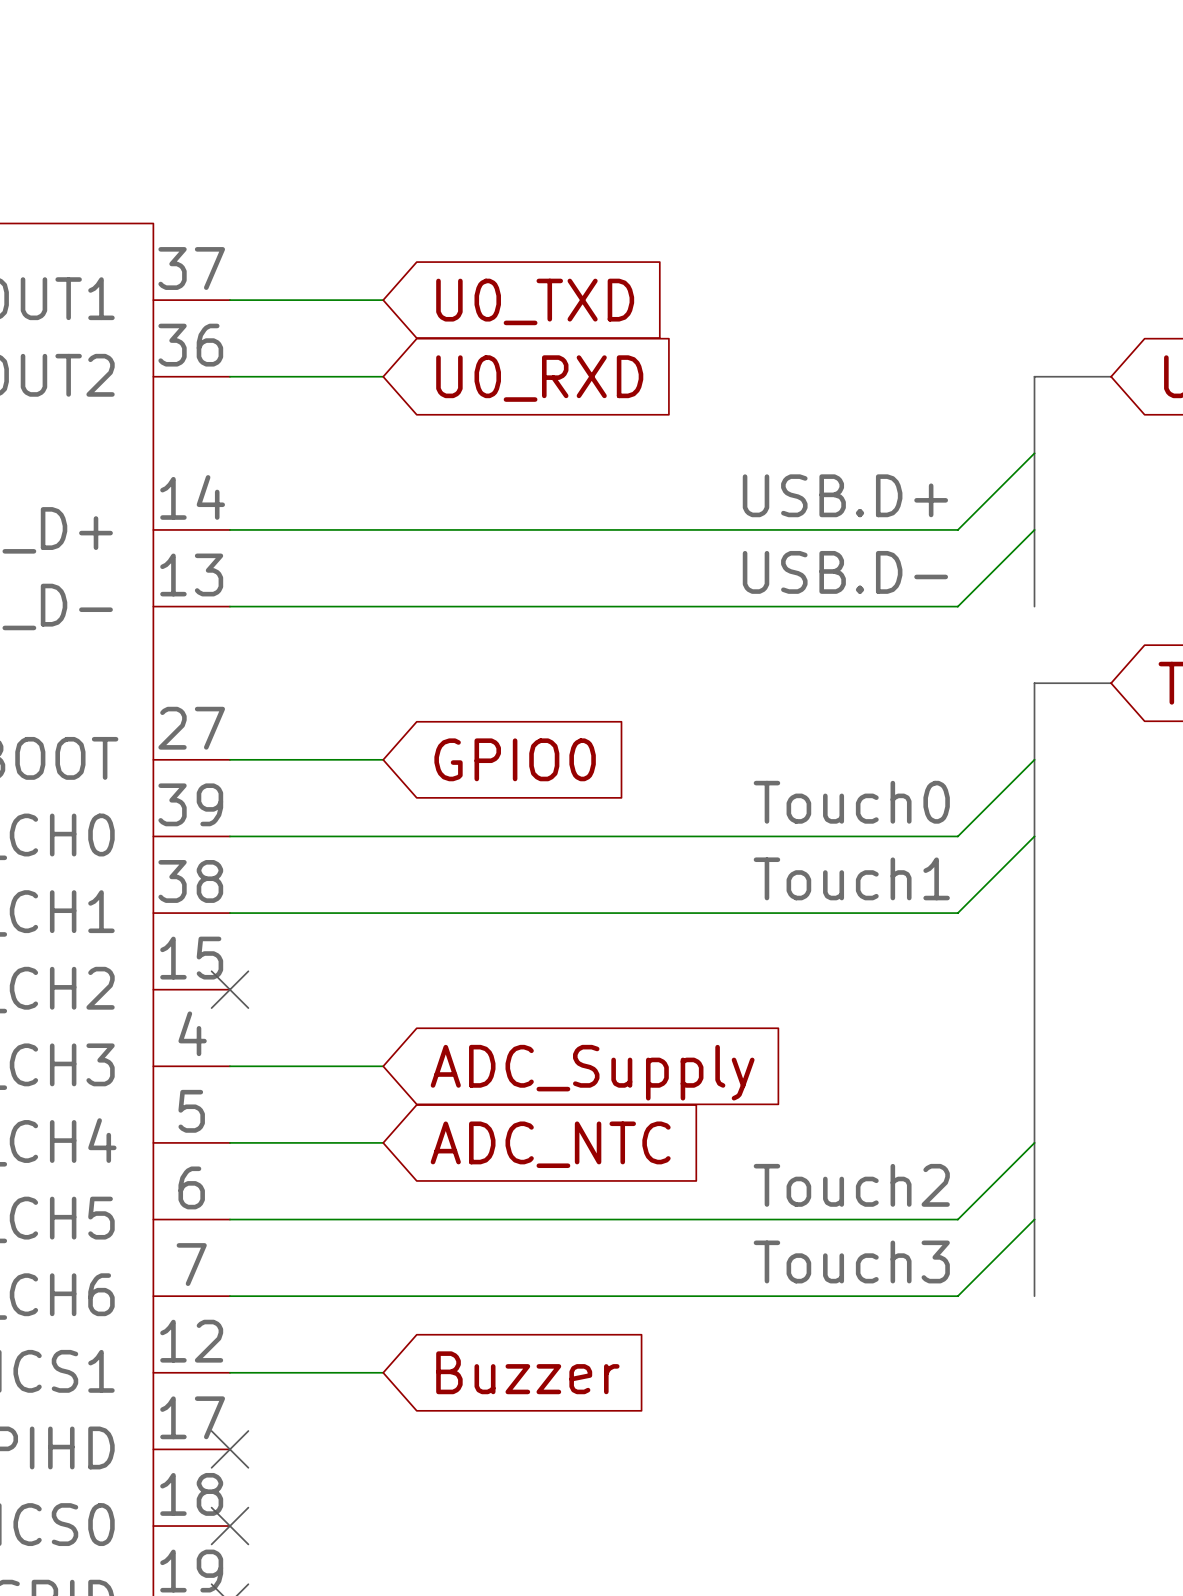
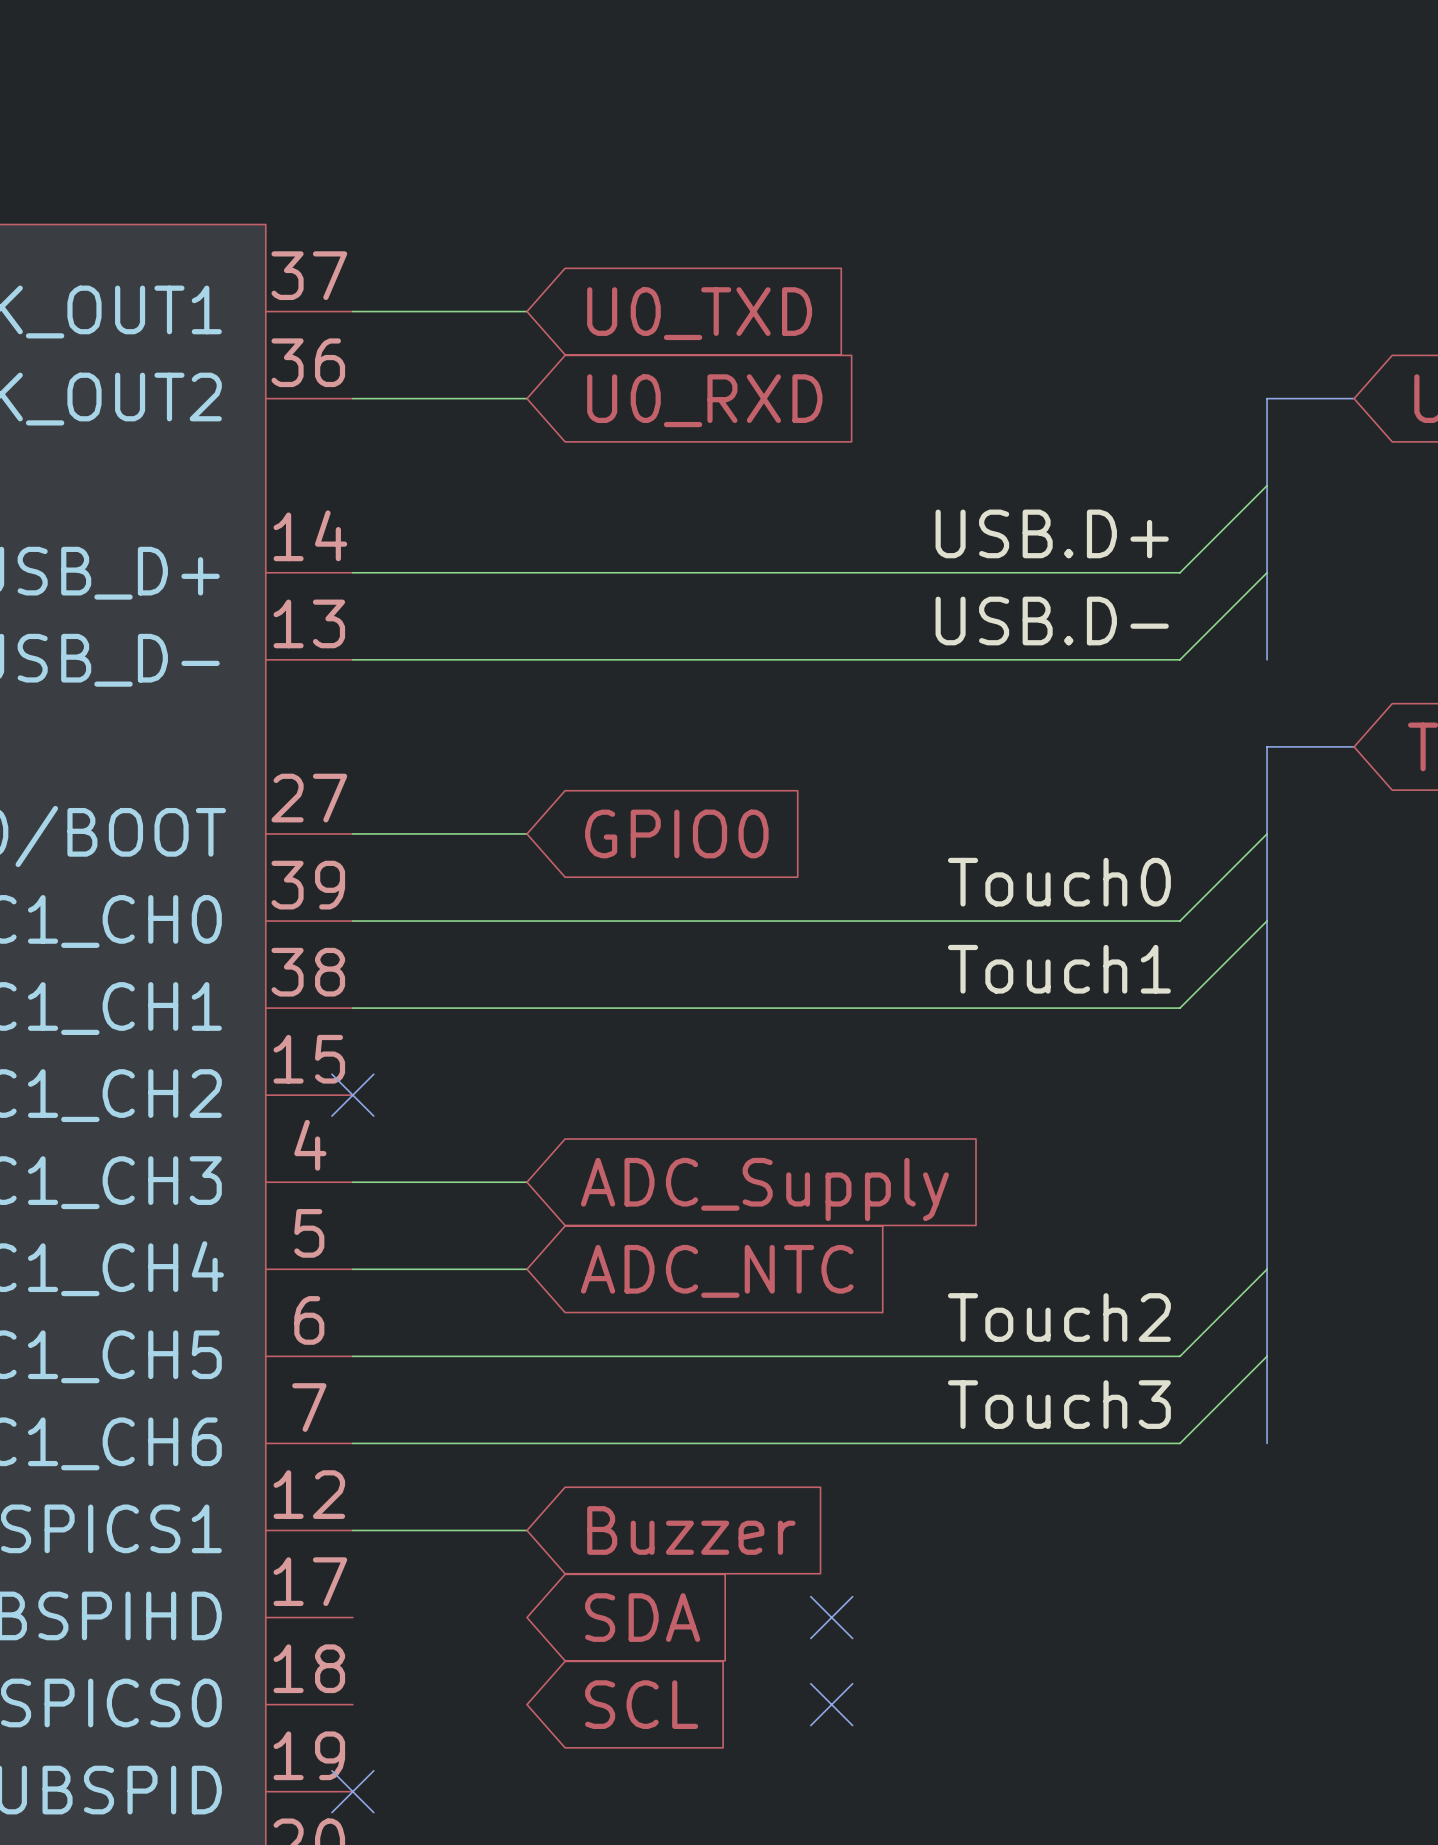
no-connect mark: (230, 1449) -> none
global label: none -> SDA (642, 1617)
no-connect mark: none -> (831, 1617)
no-connect mark: (230, 1526) -> none
global label: none -> SCL (641, 1704)
no-connect mark: none -> (831, 1704)

